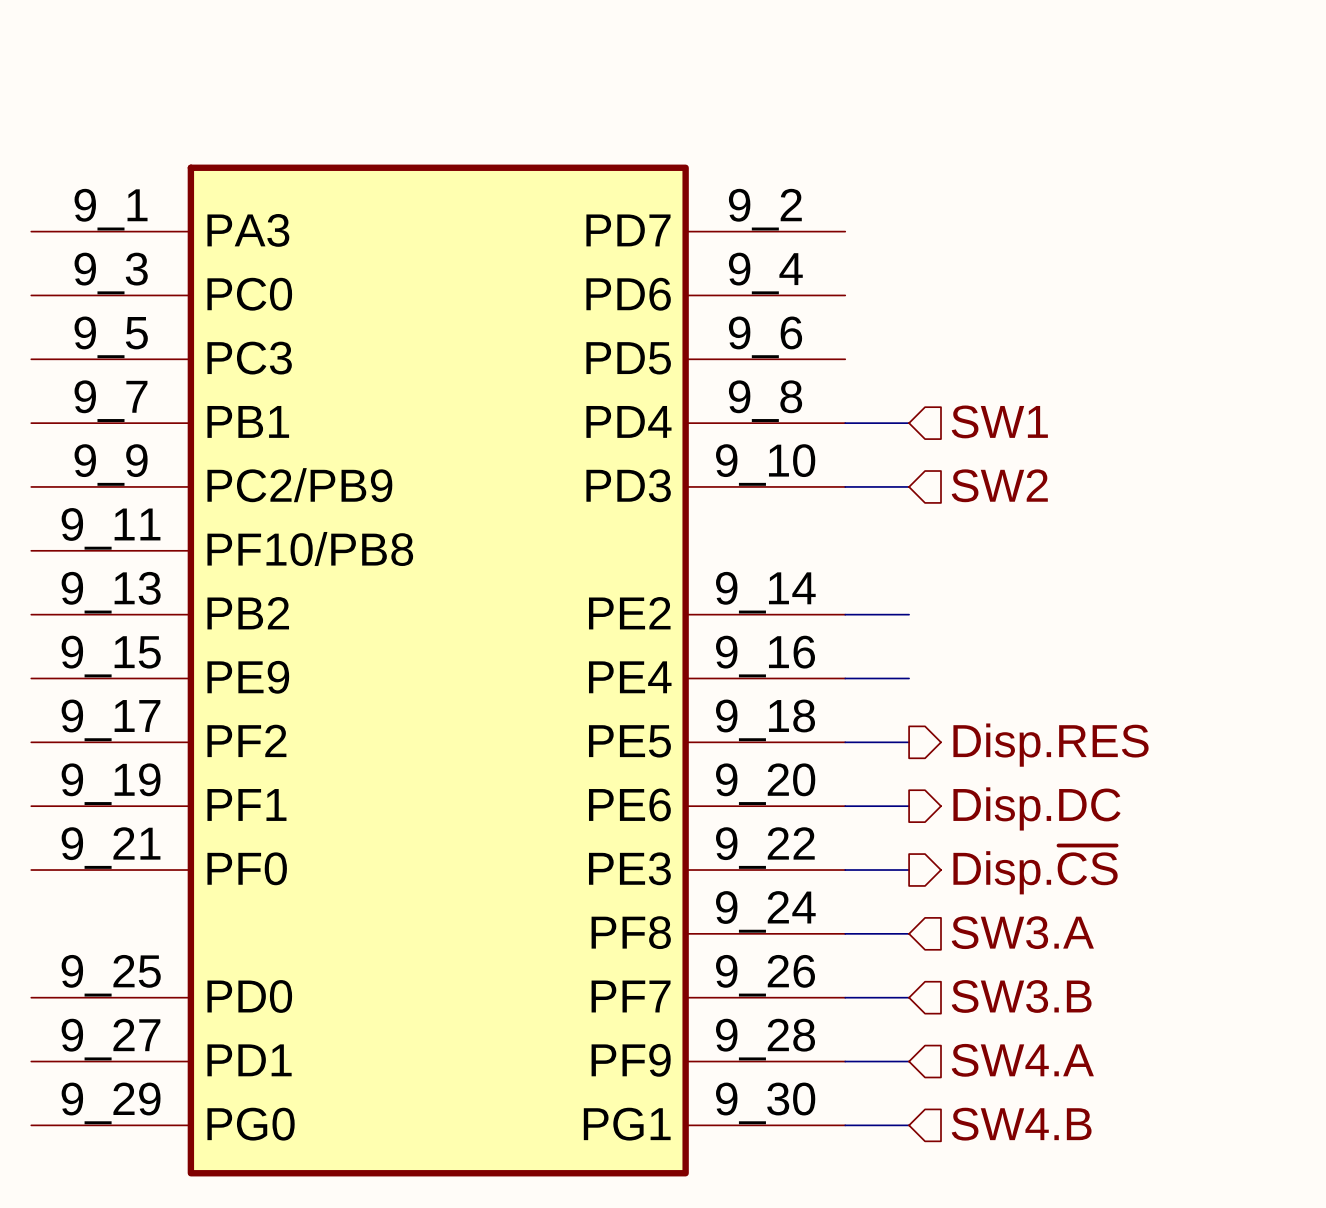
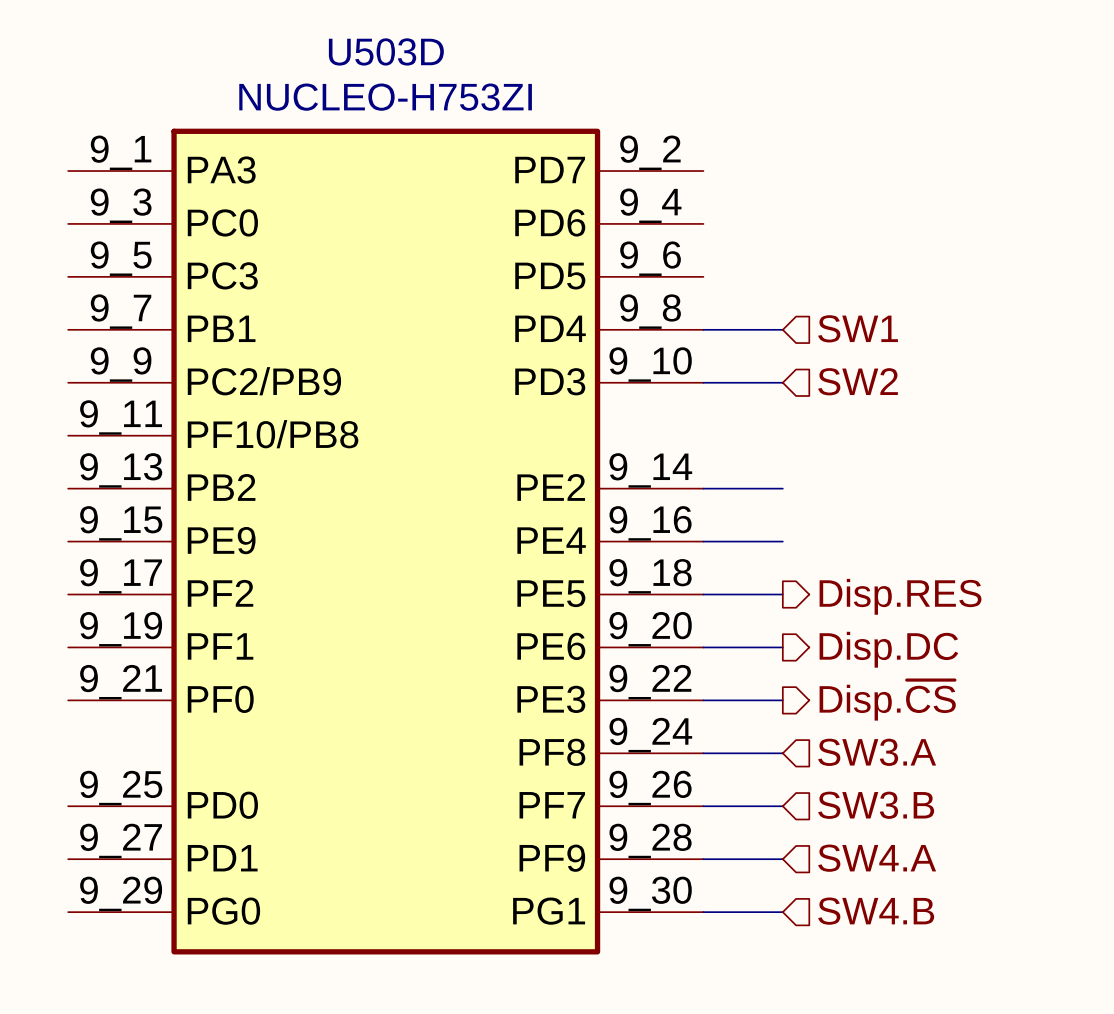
part: (438, 670) -> none
U503D: none -> NUCLEO-H753ZI (385, 541)

